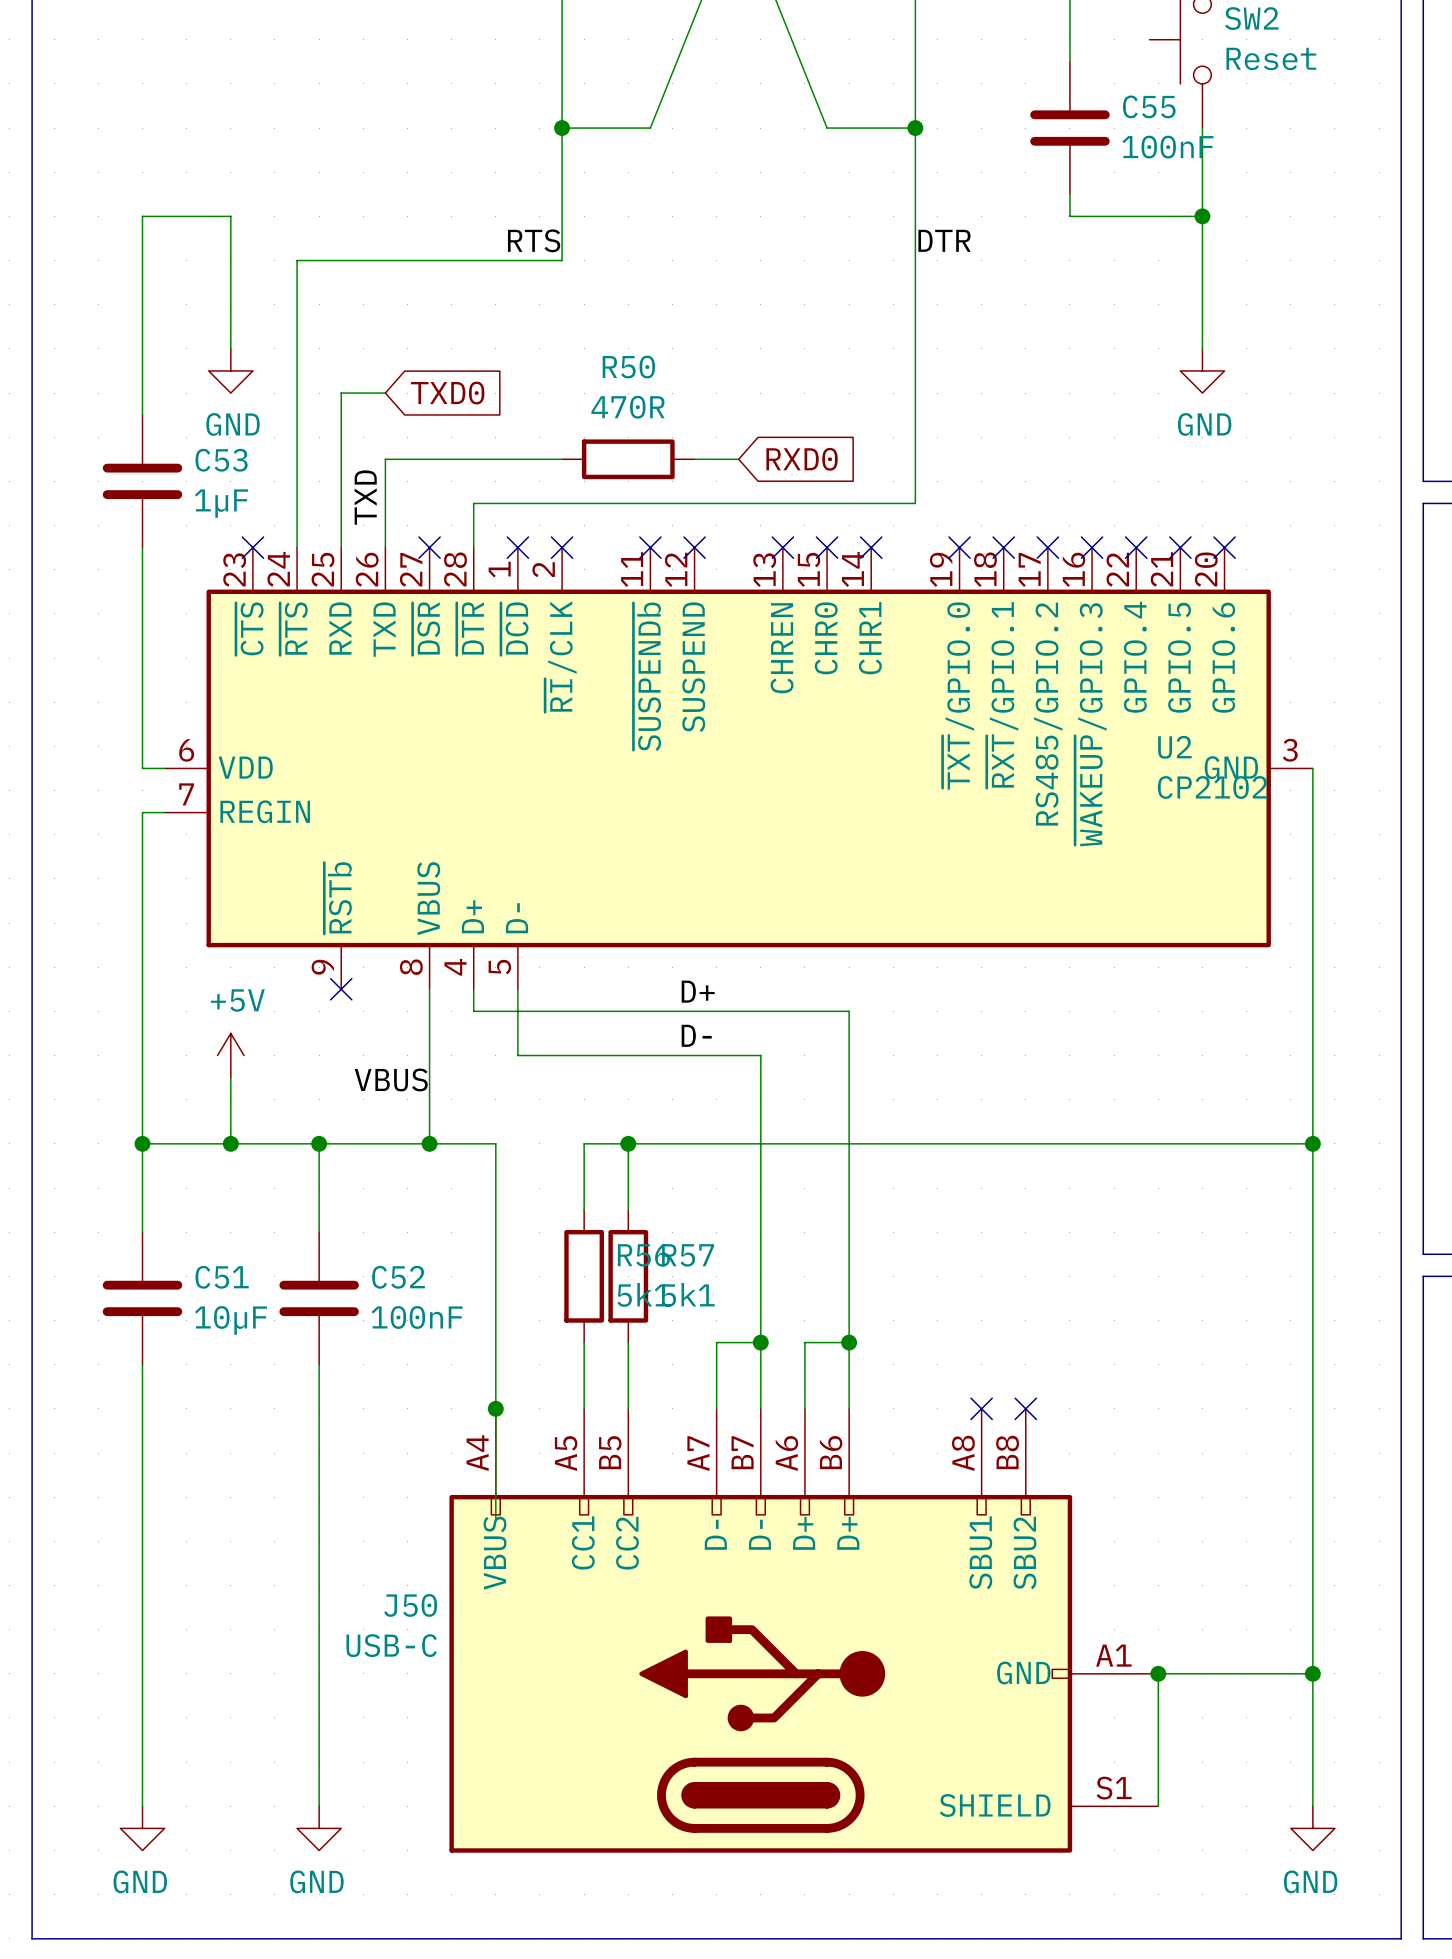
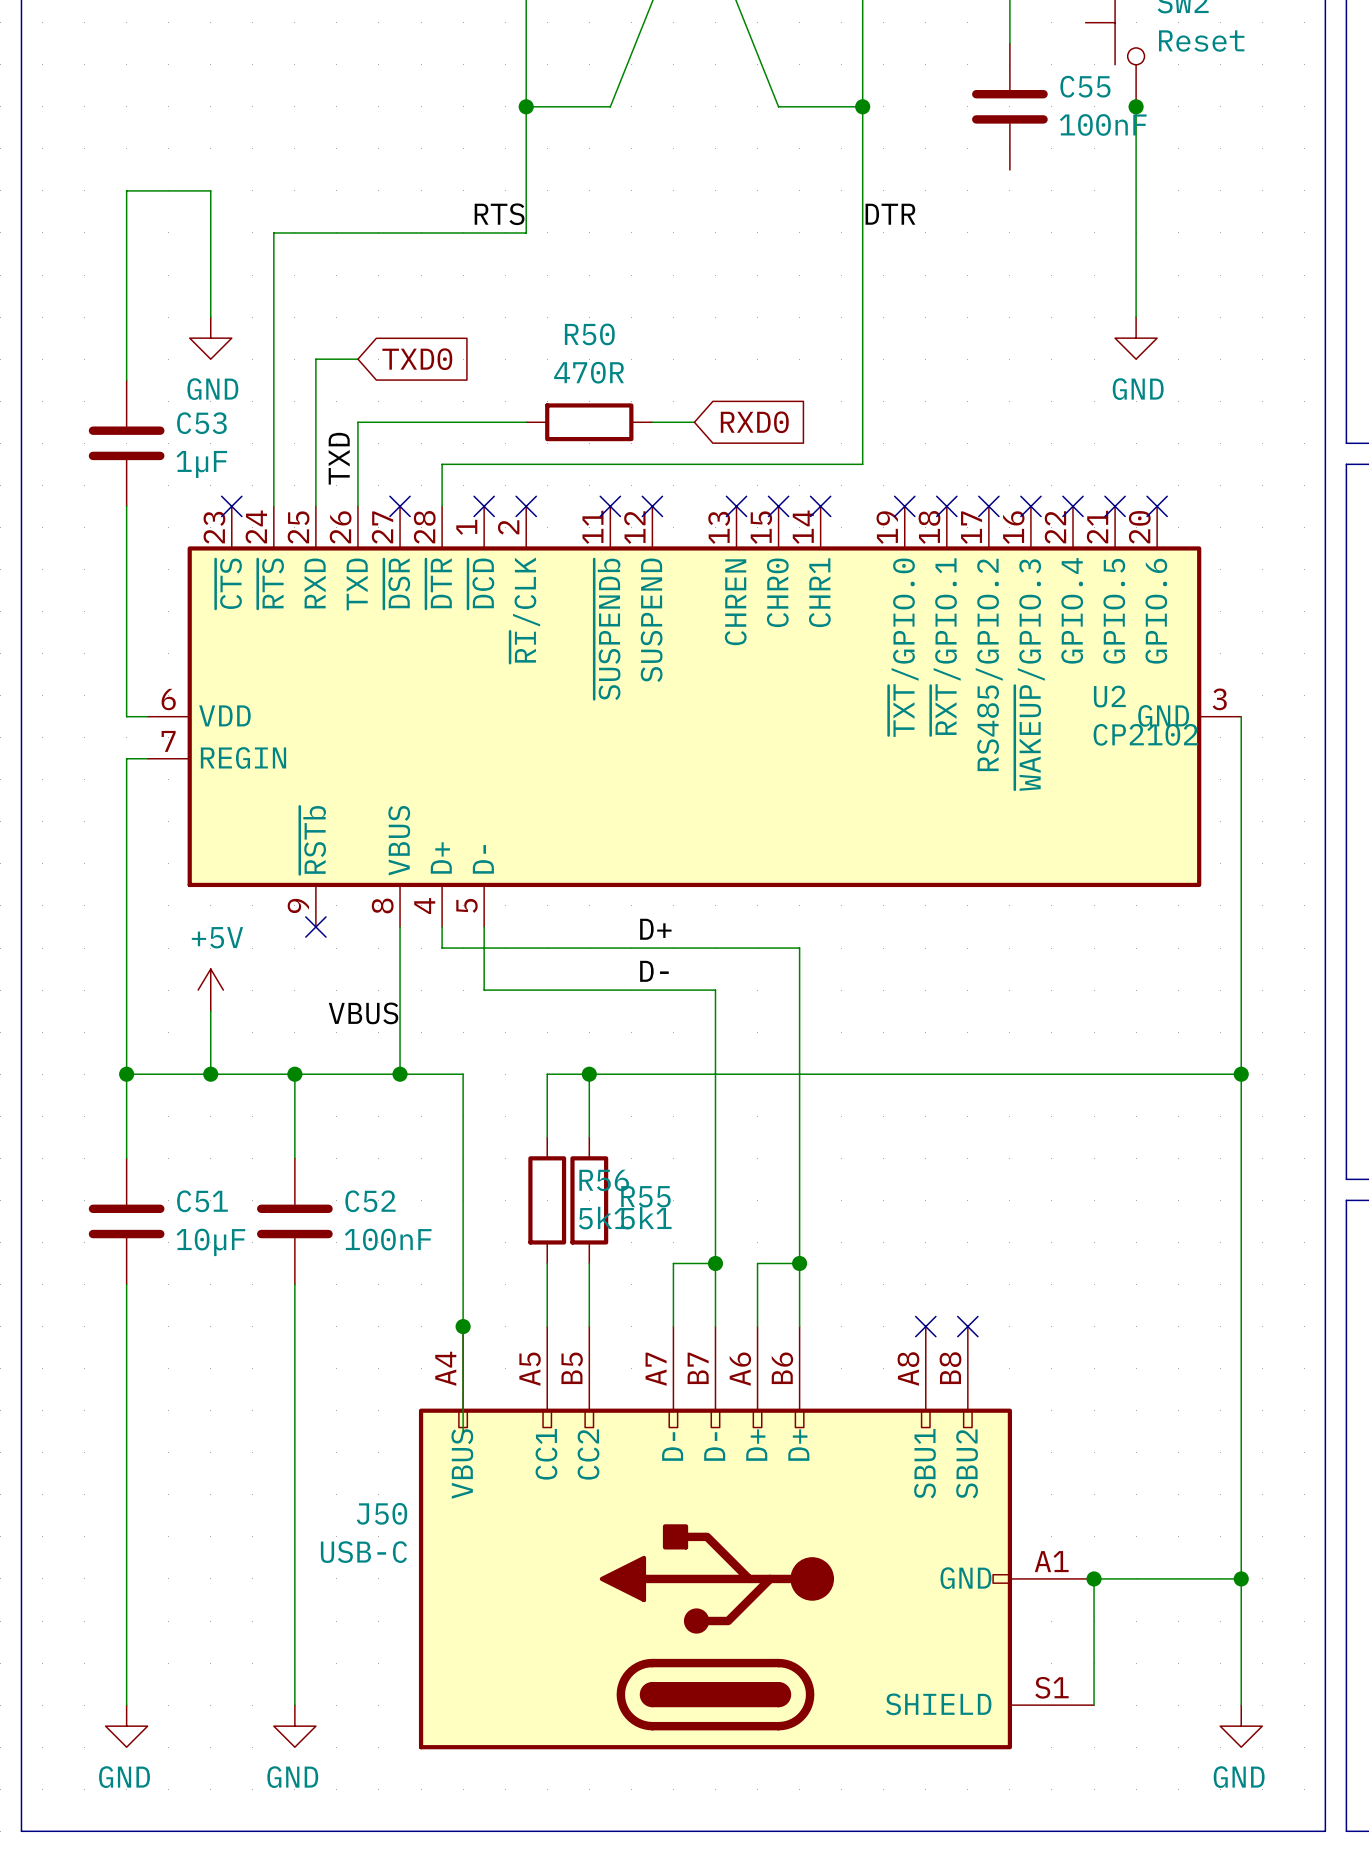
junction: none -> (1136, 106)
wire: (1069, 194) (1069, 216) (1202, 216) -> none
junction: (1202, 216) -> none
R57 name: R57 (688, 1255) -> R55 (645, 1196)

